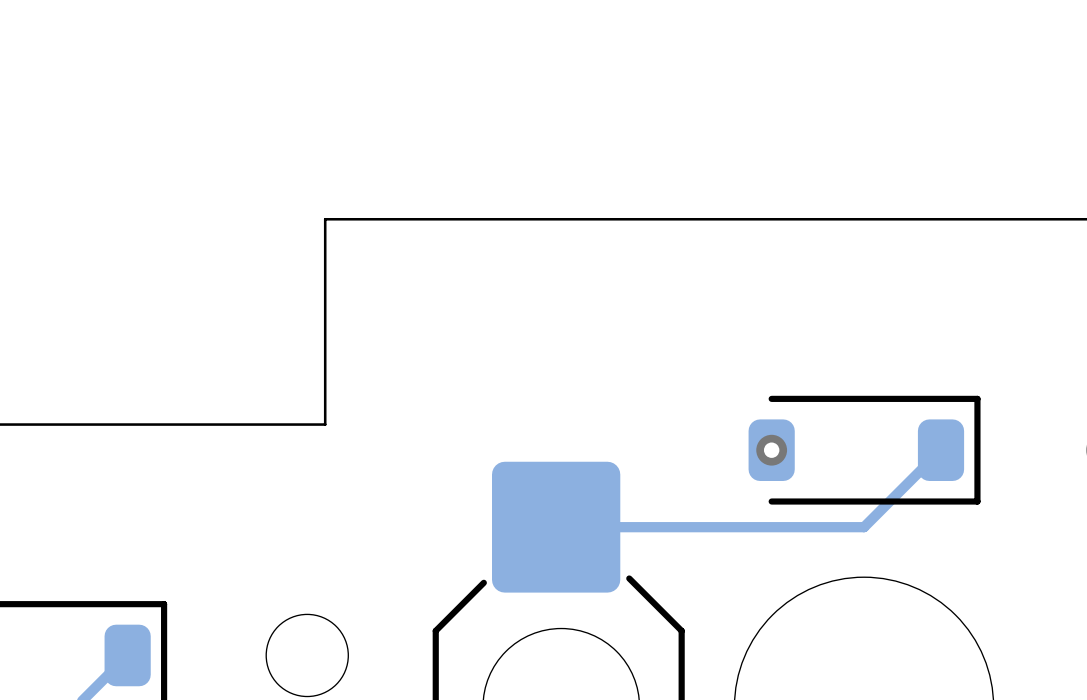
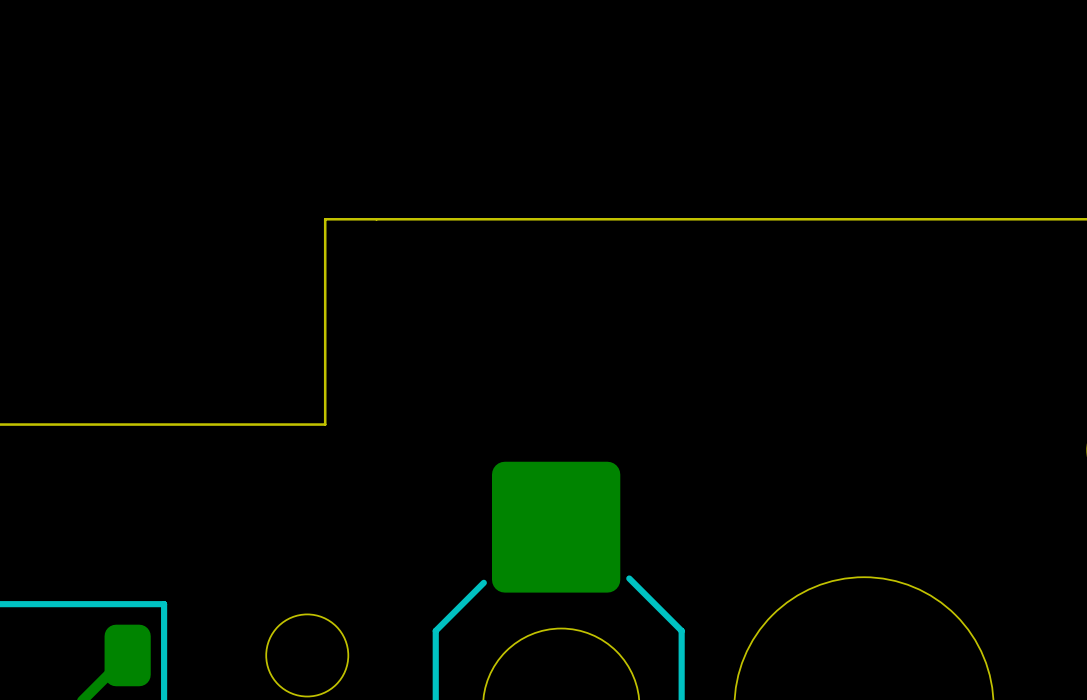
via: (771, 450) -> none
part: (864, 450) -> none
track: (941, 450) (864, 527) (556, 527) -> none

